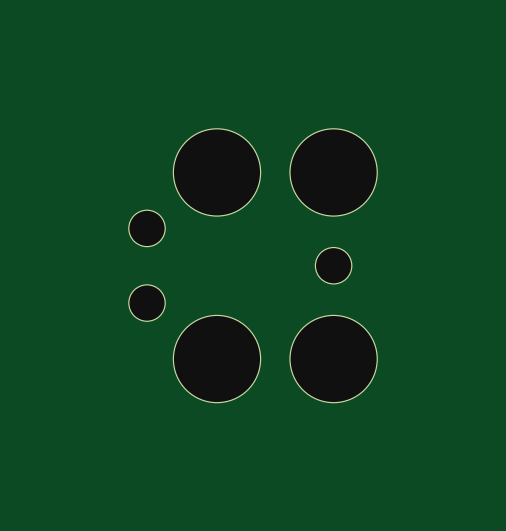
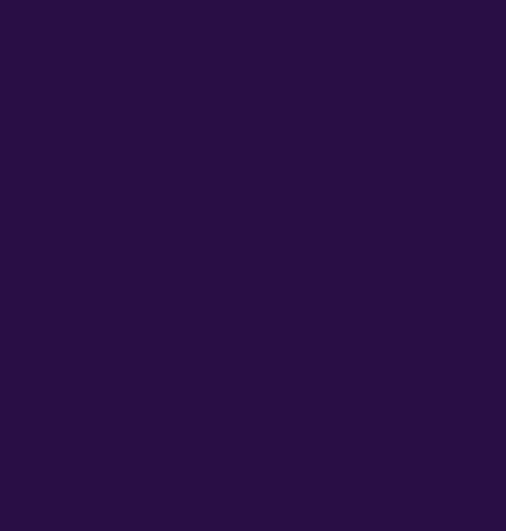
part: (253, 265) -> none

